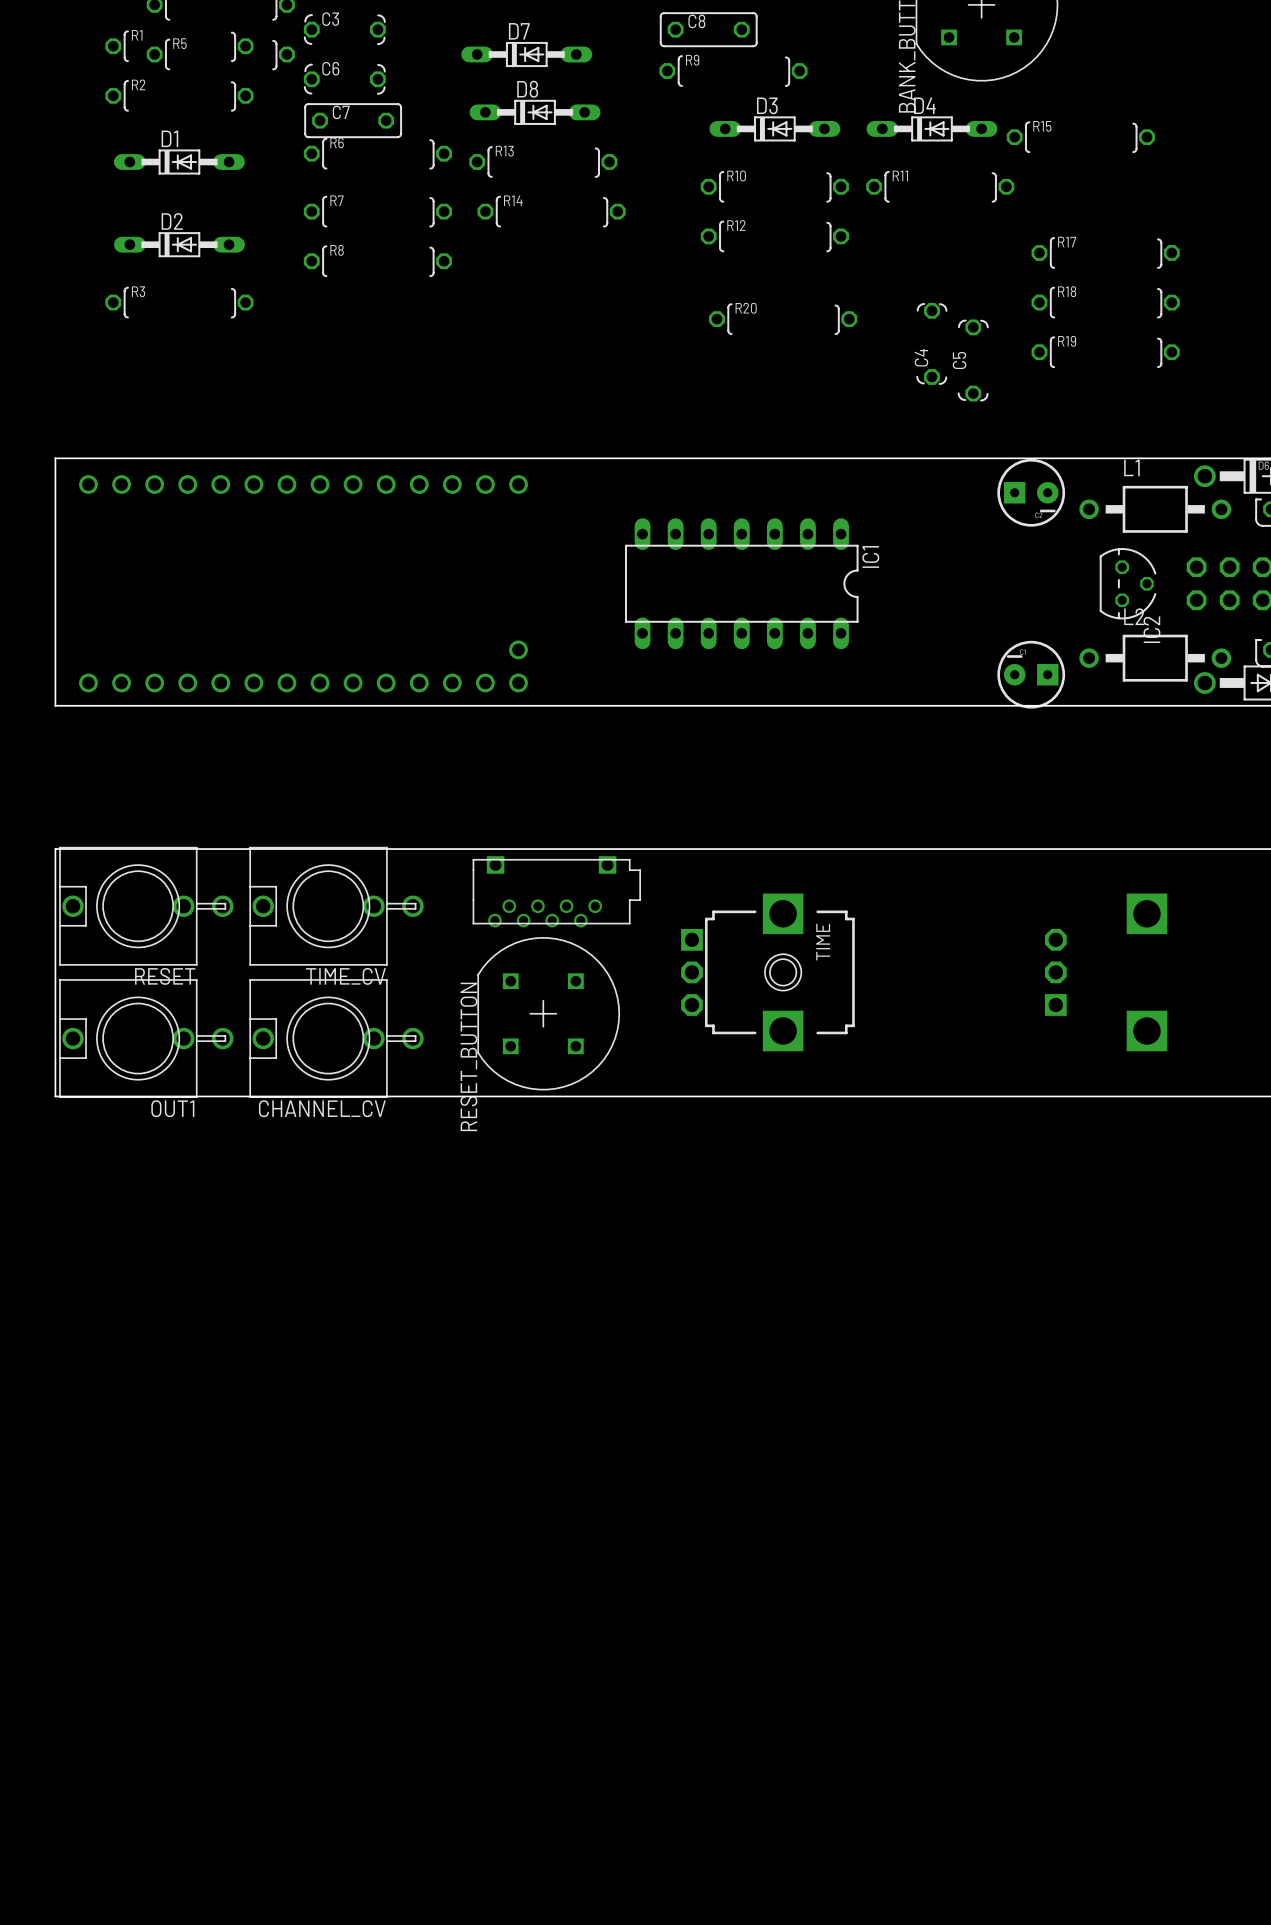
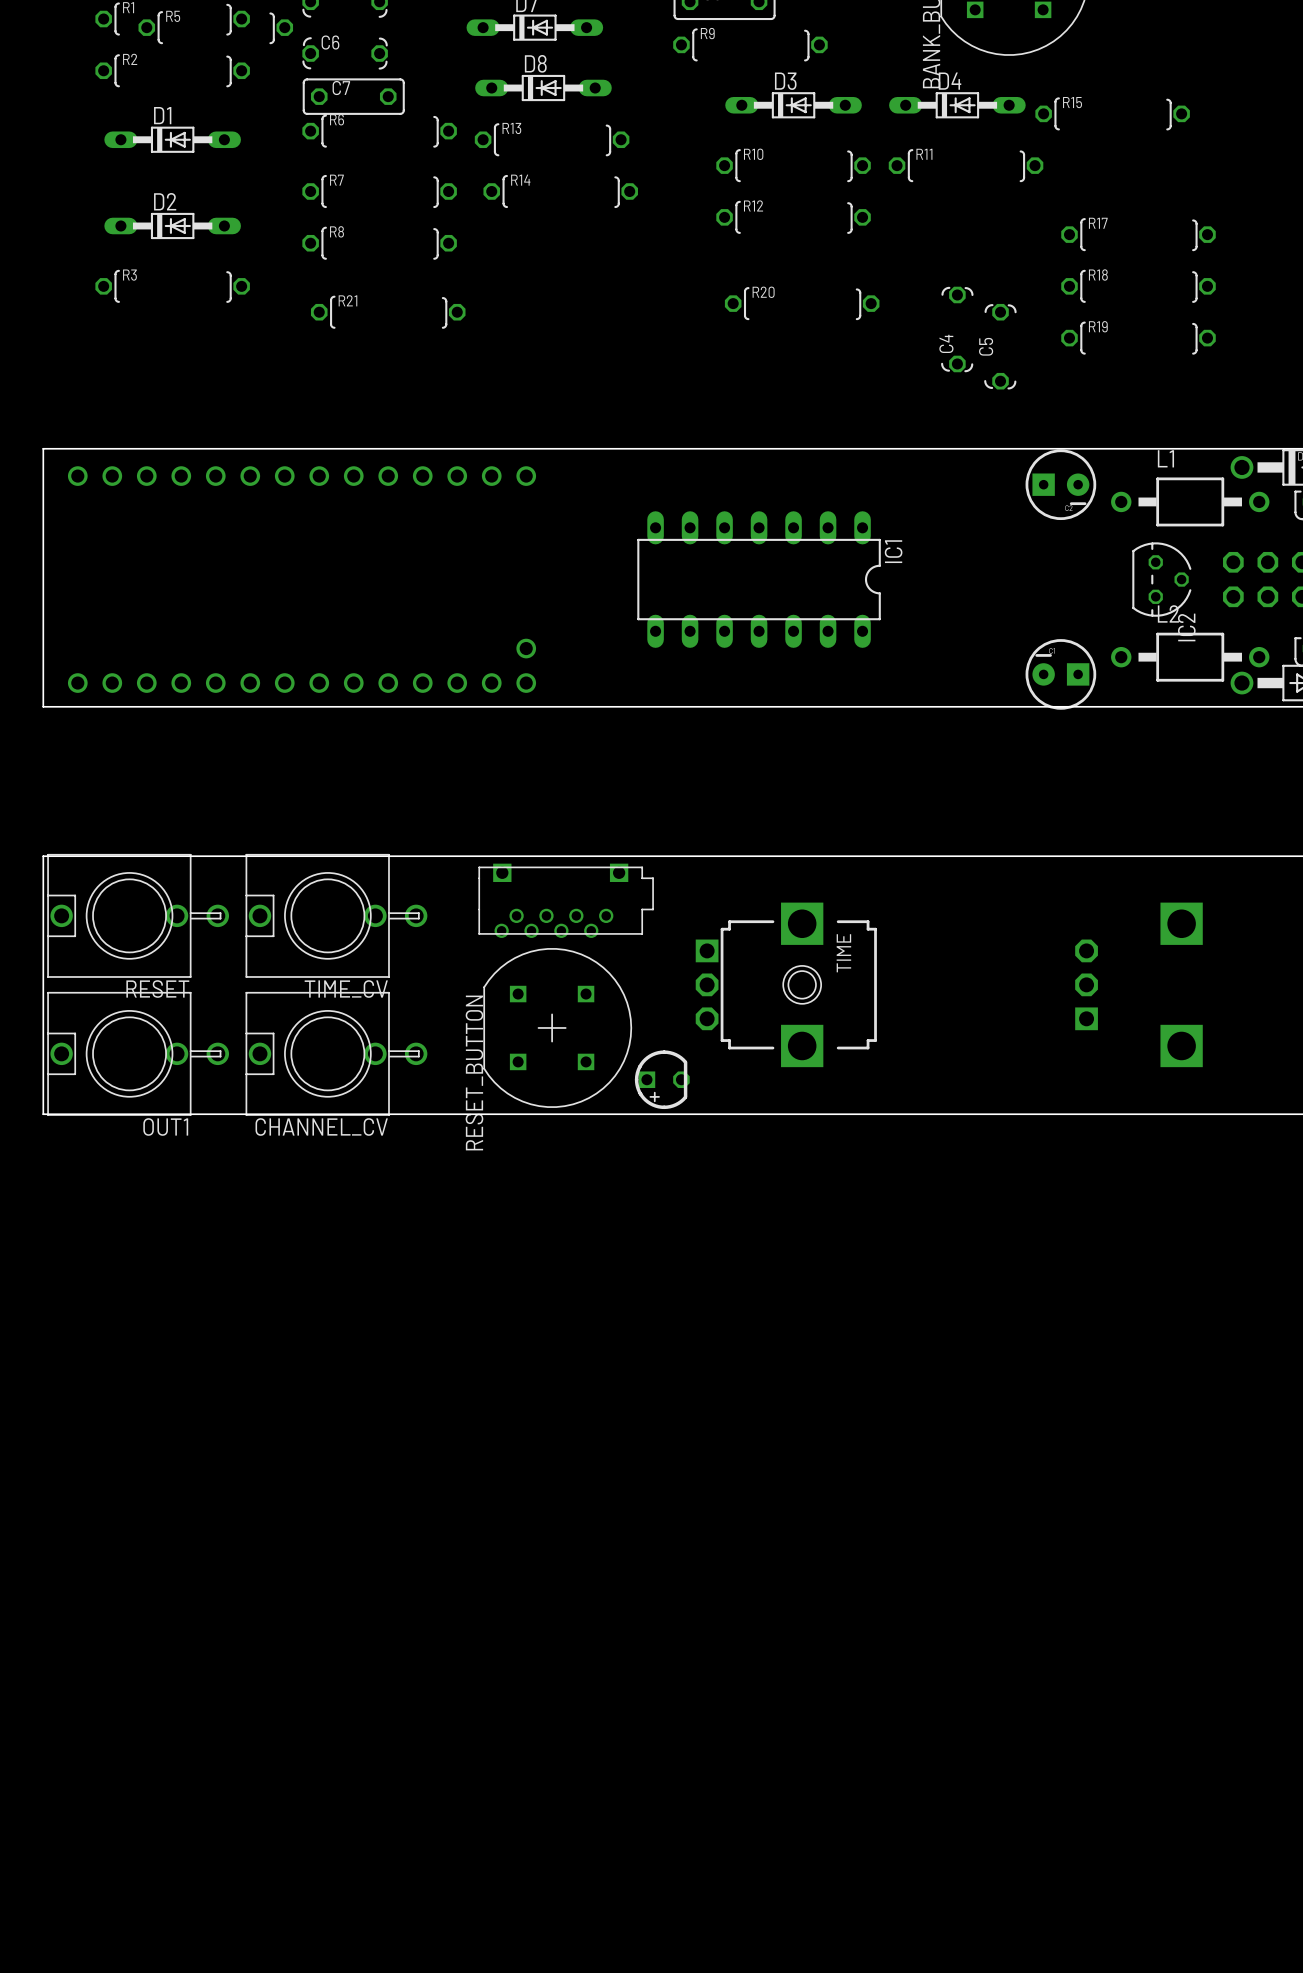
R21: none -> (388, 312)
part: none -> (662, 1079)

